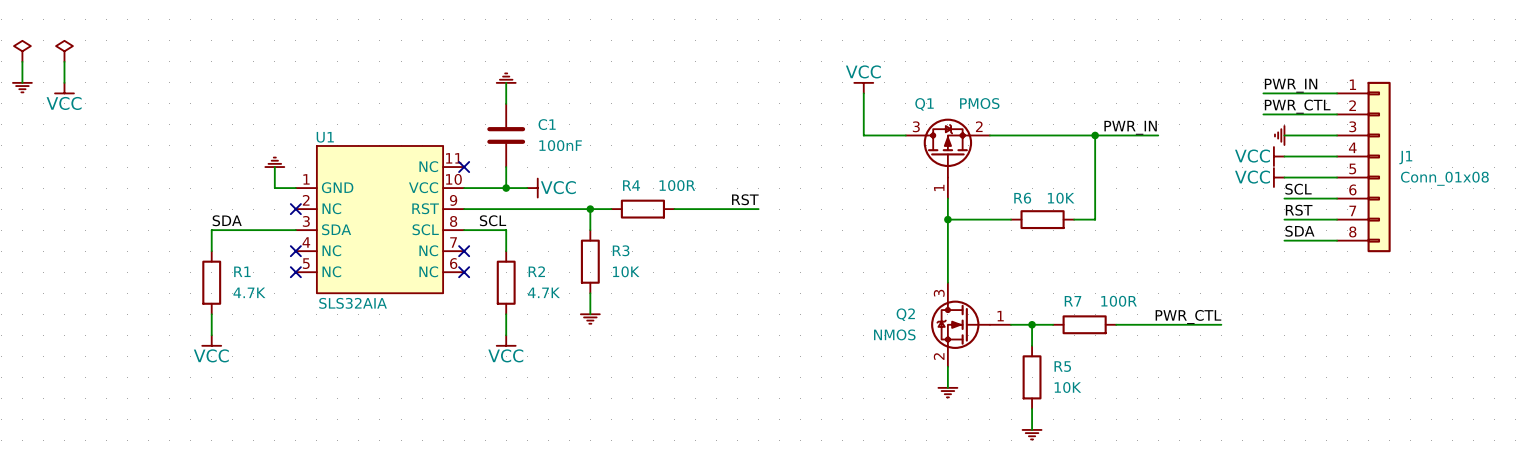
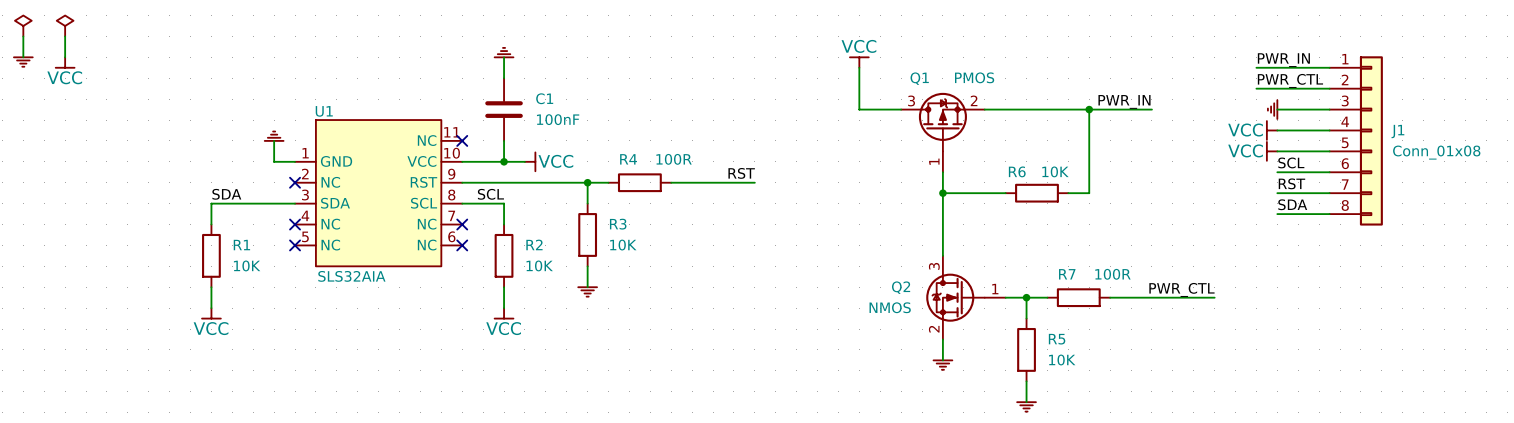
R1 value: 4.7K (249, 292) -> 10K (247, 265)
R2 value: 4.7K (543, 292) -> 10K (539, 265)

